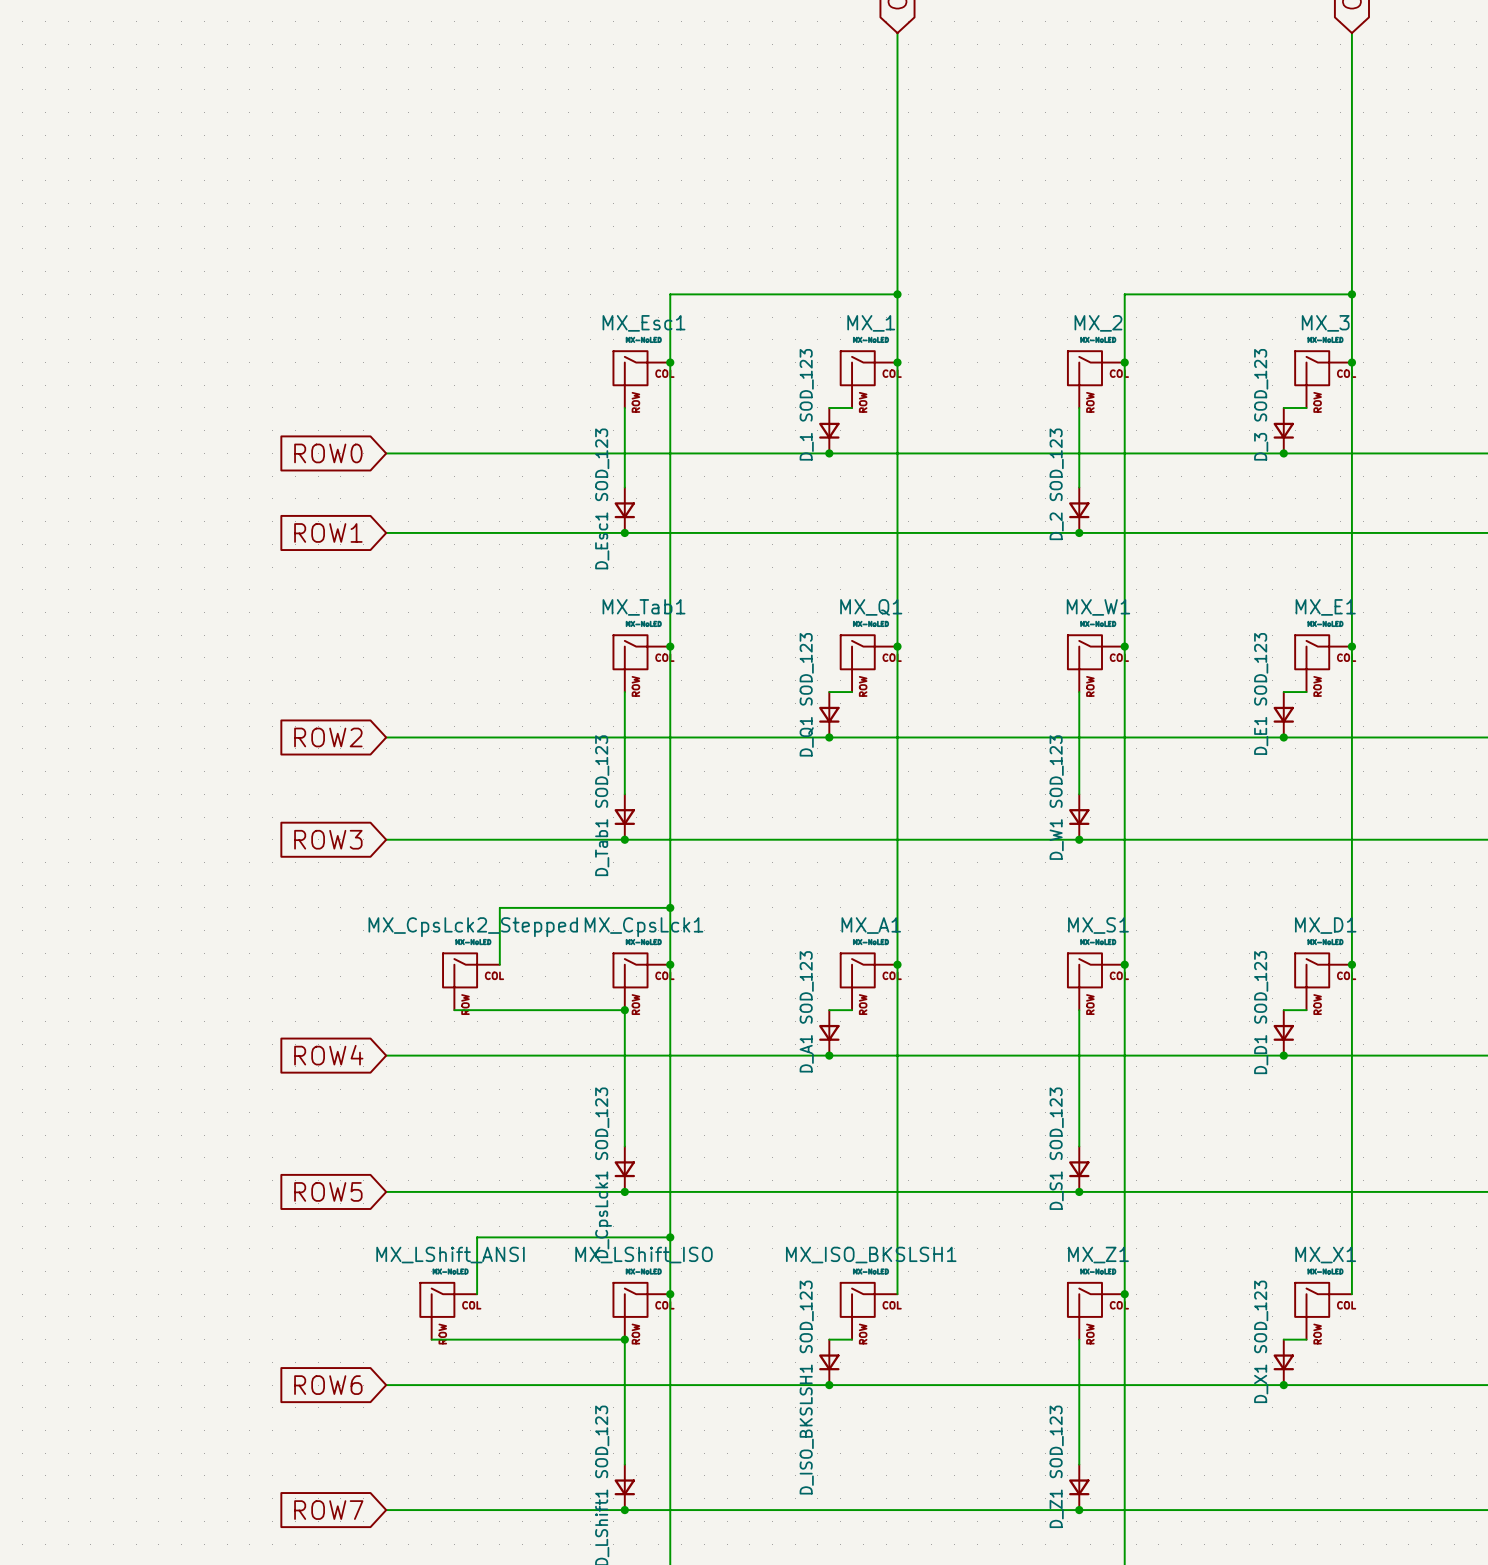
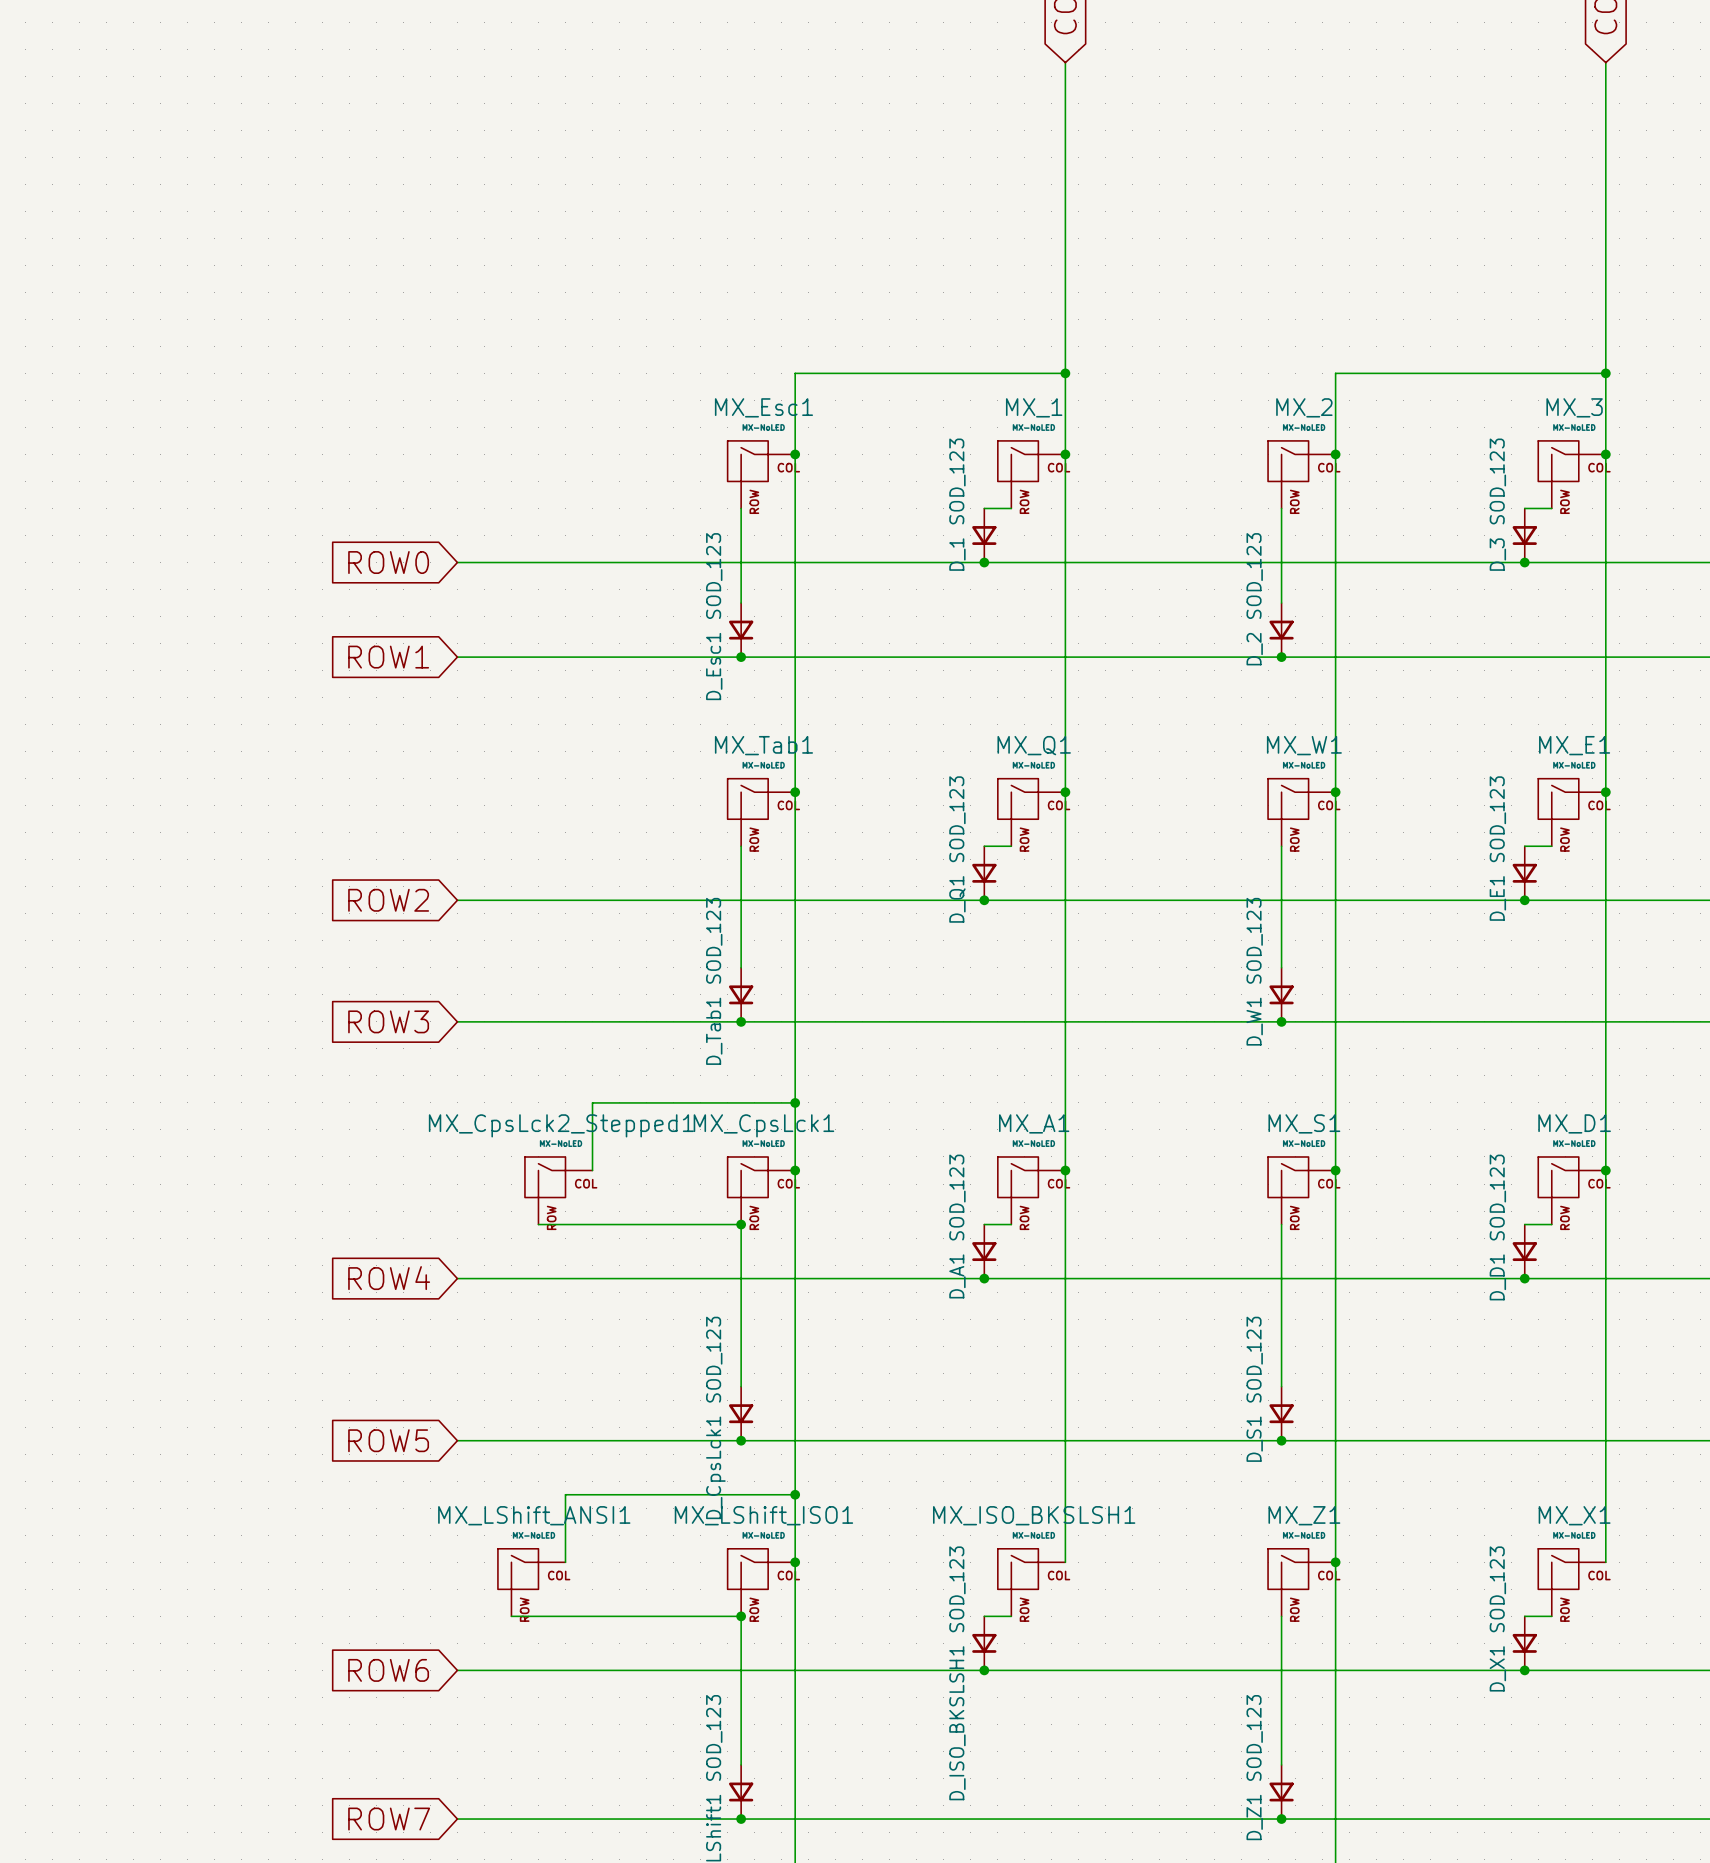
MX_CpsLck2_Stepped name: MX_CpsLck2_Stepped (473, 927) -> MX_CpsLck2_Stepped1 (561, 1125)
MX_LShift_ANSI name: MX_LShift_ANSI (450, 1255) -> MX_LShift_ANSI1 (534, 1515)
MX_LShift_ISO name: MX_LShift_ISO (643, 1255) -> MX_LShift_ISO1 (763, 1515)

